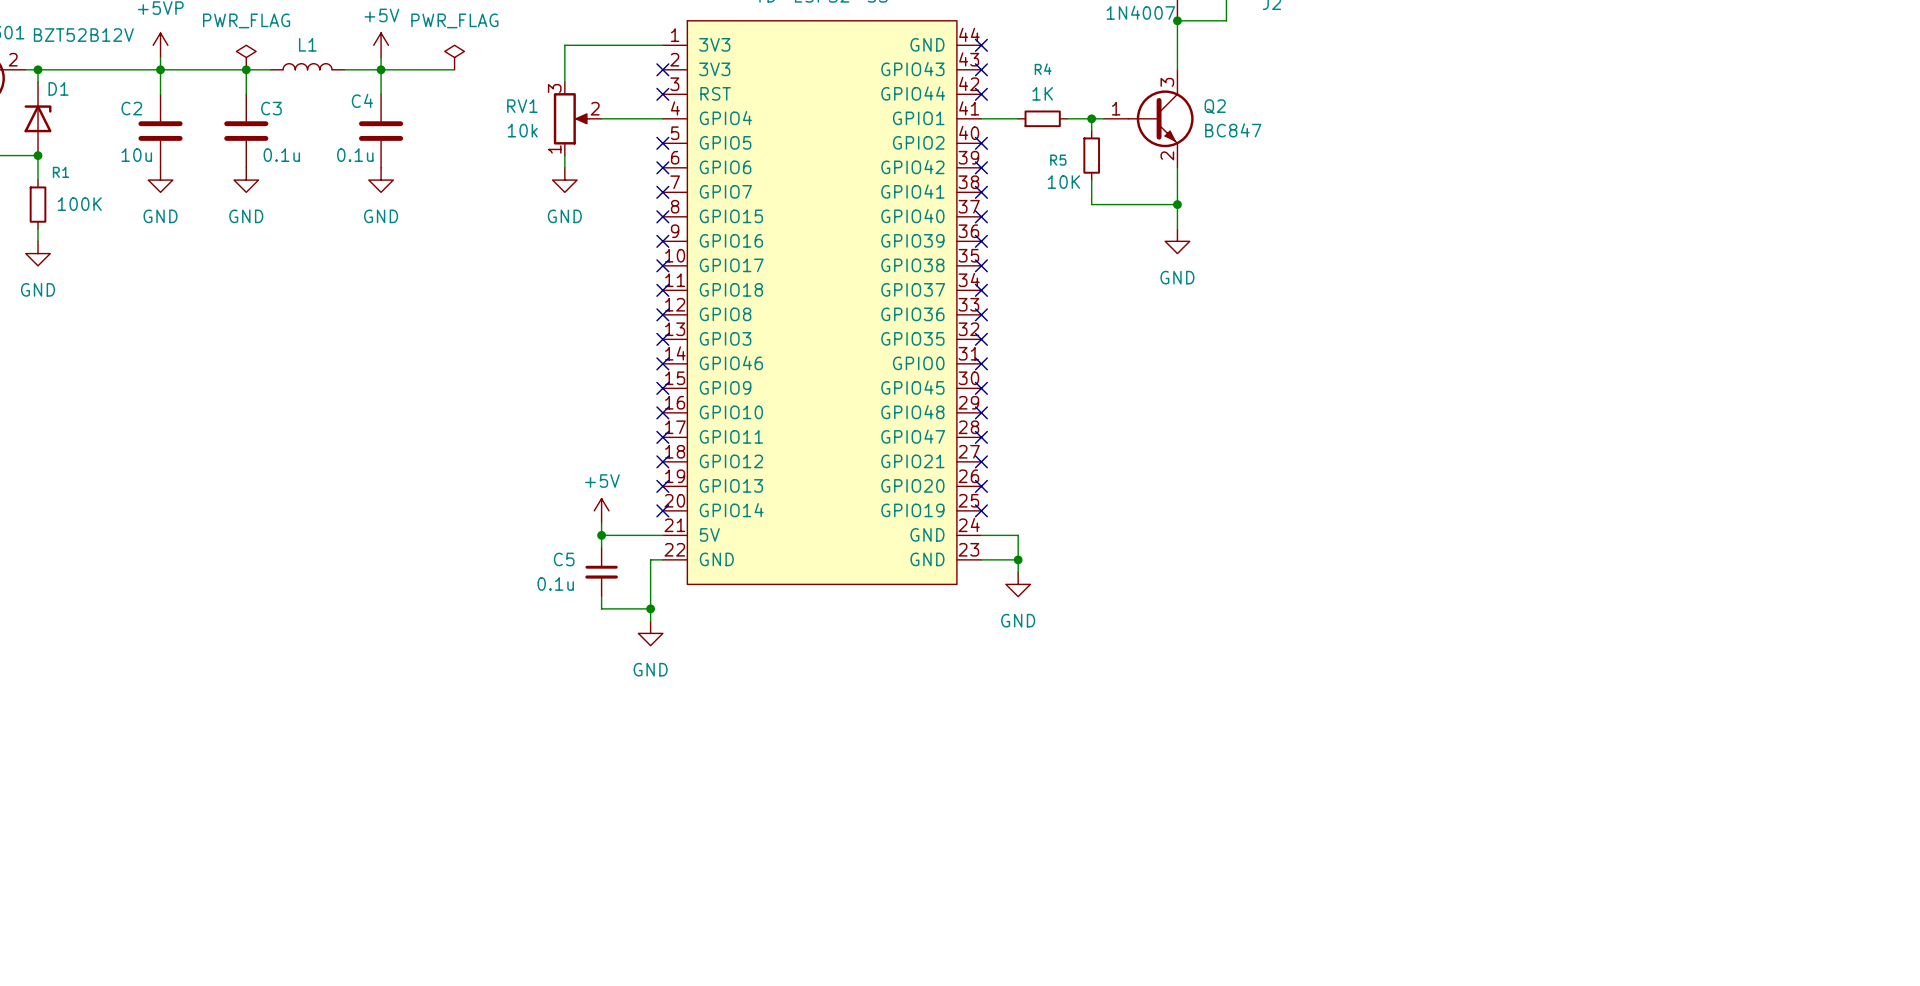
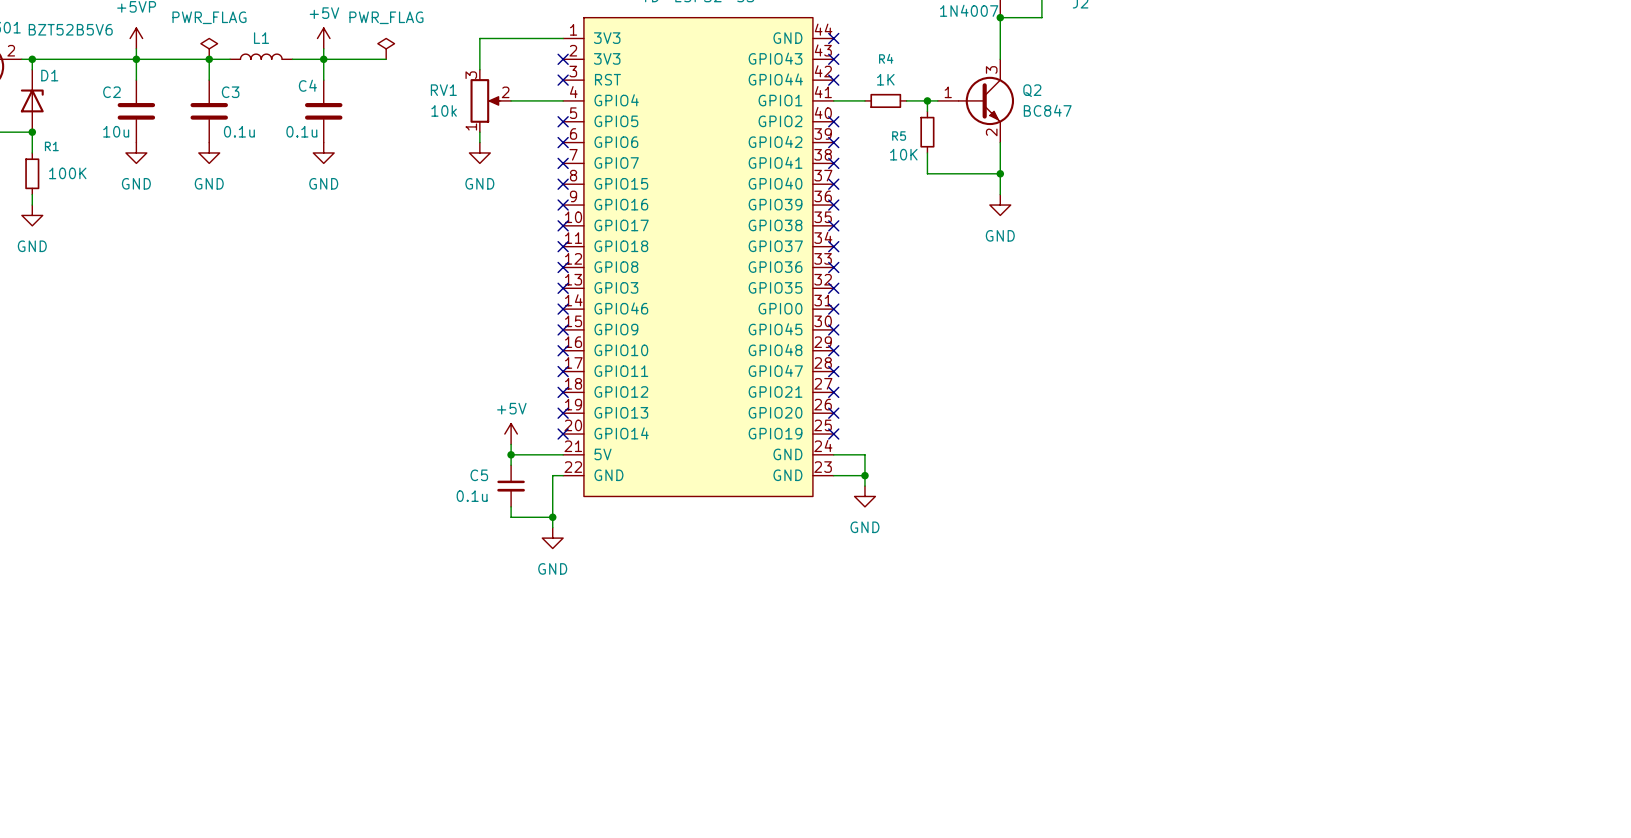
D1 value: BZT52B12V (83, 35) -> BZT52B5V6 (70, 29)

